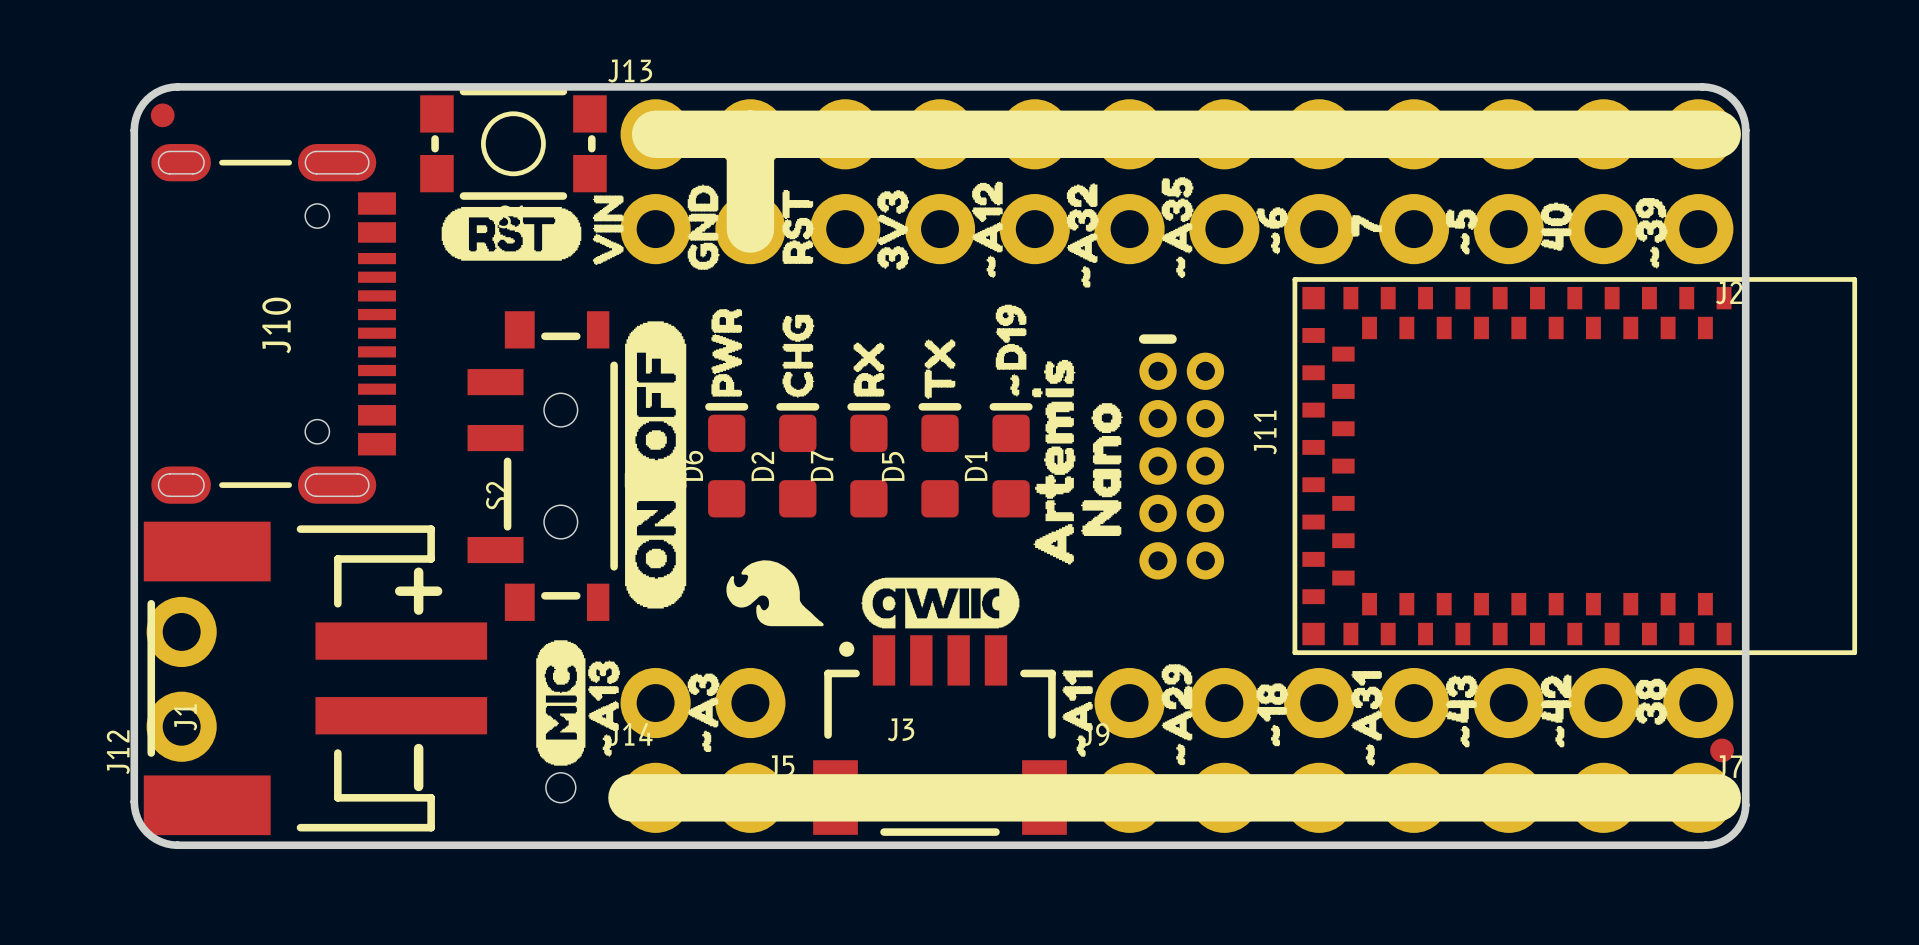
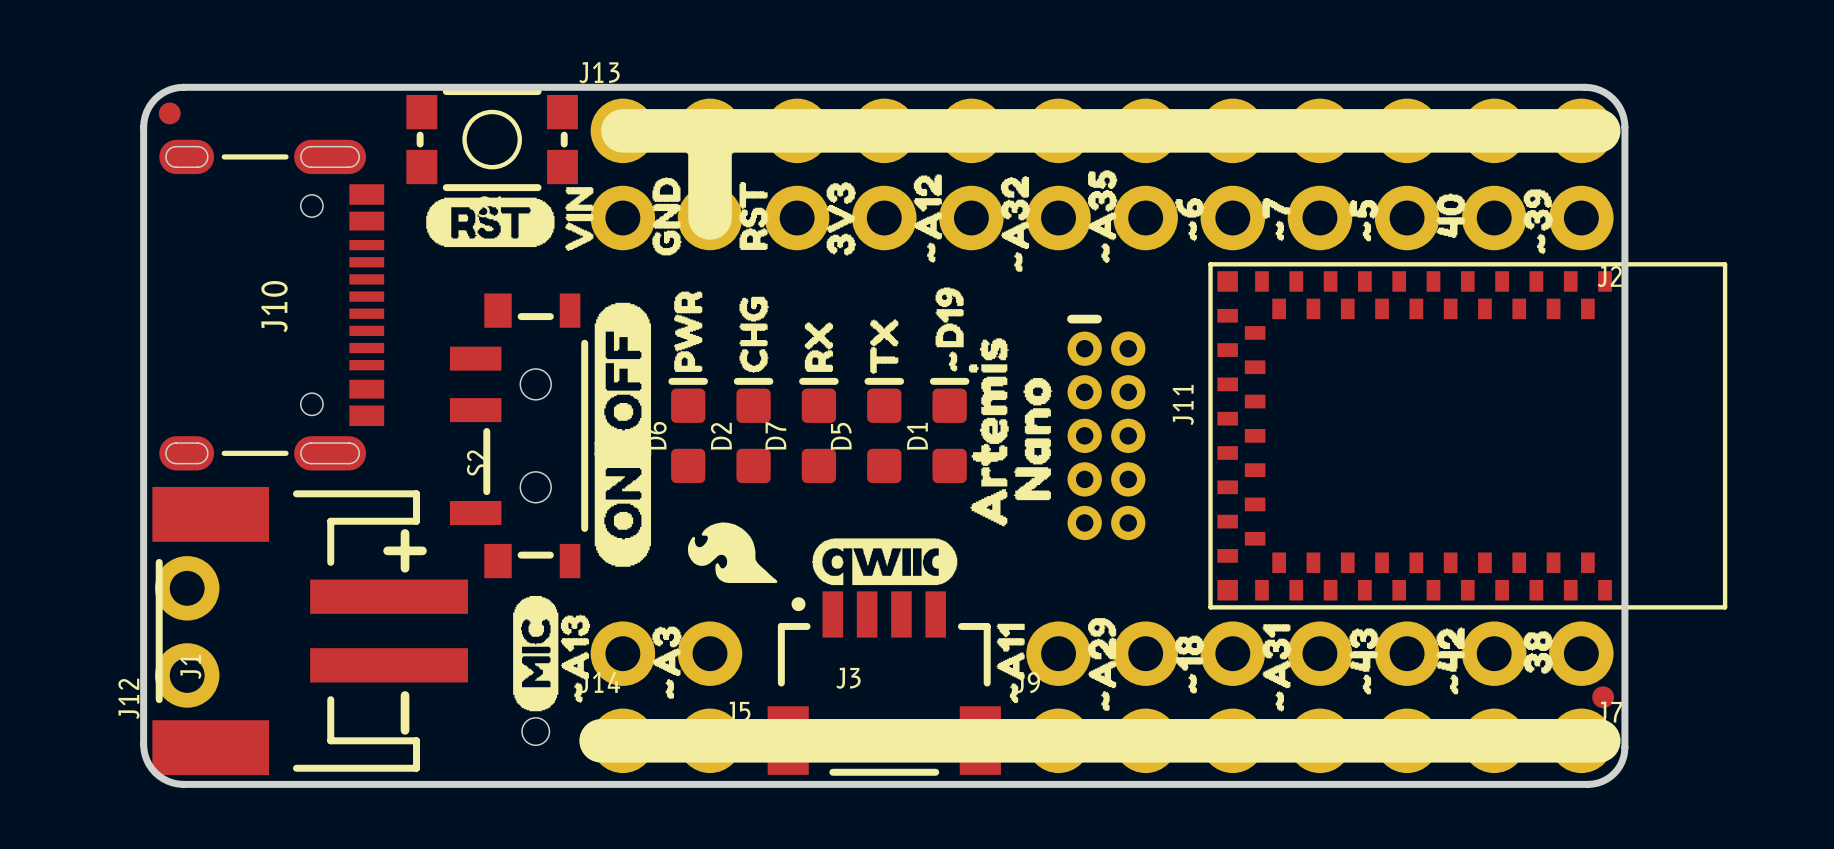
drawing shape: [1351, 215, 1382, 237] -> [1262, 198, 1291, 242]

